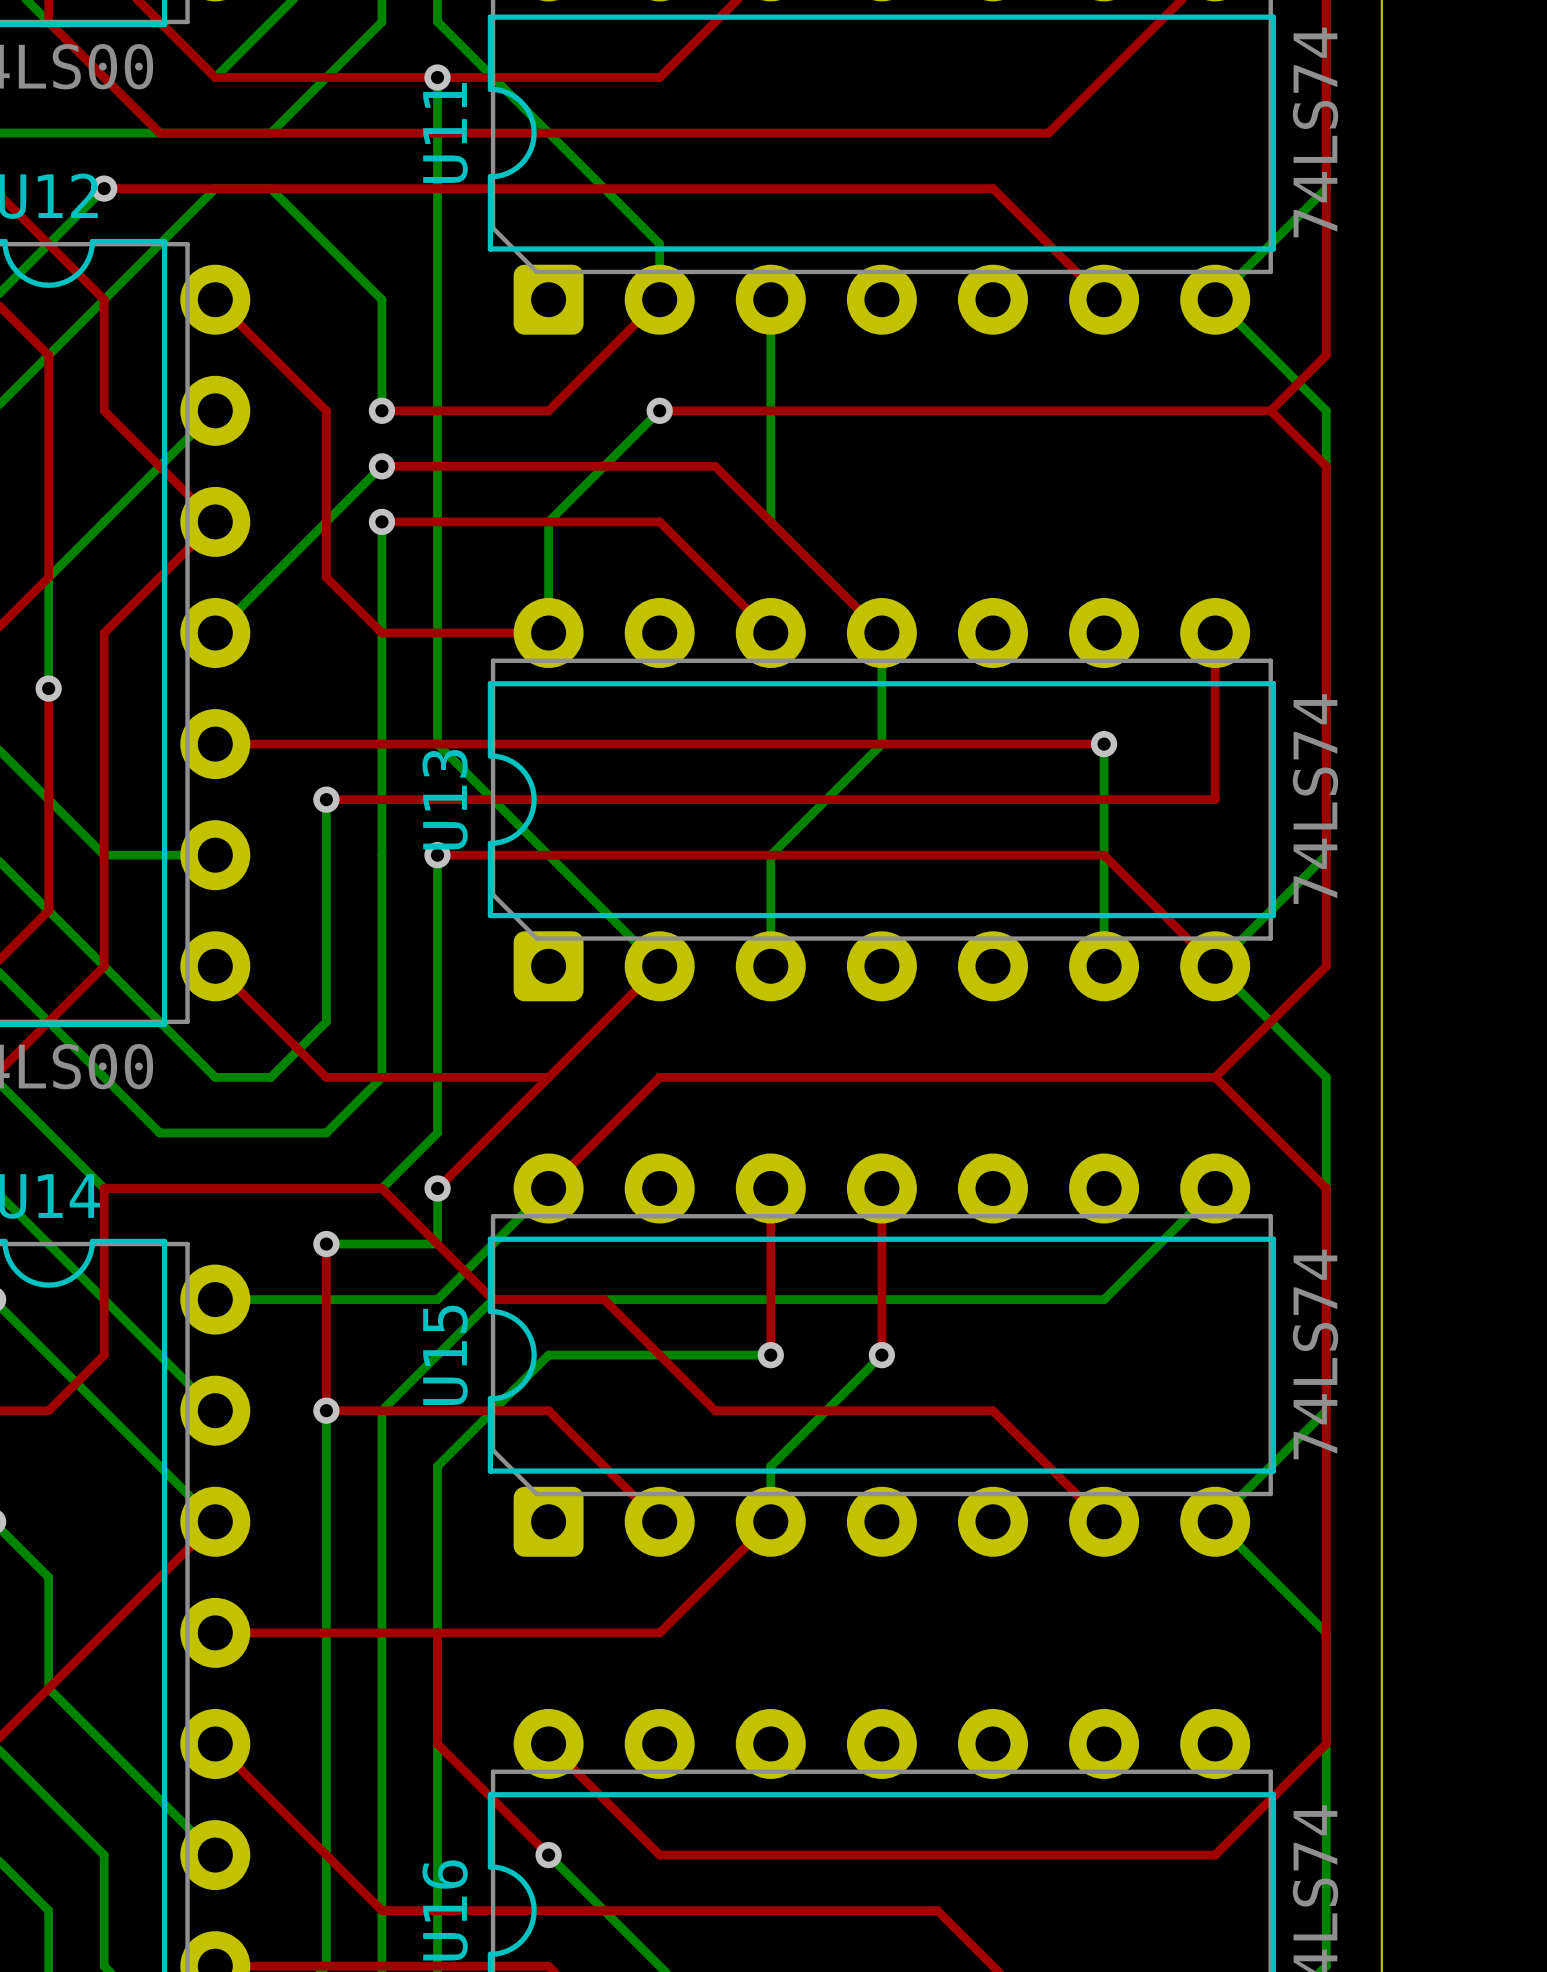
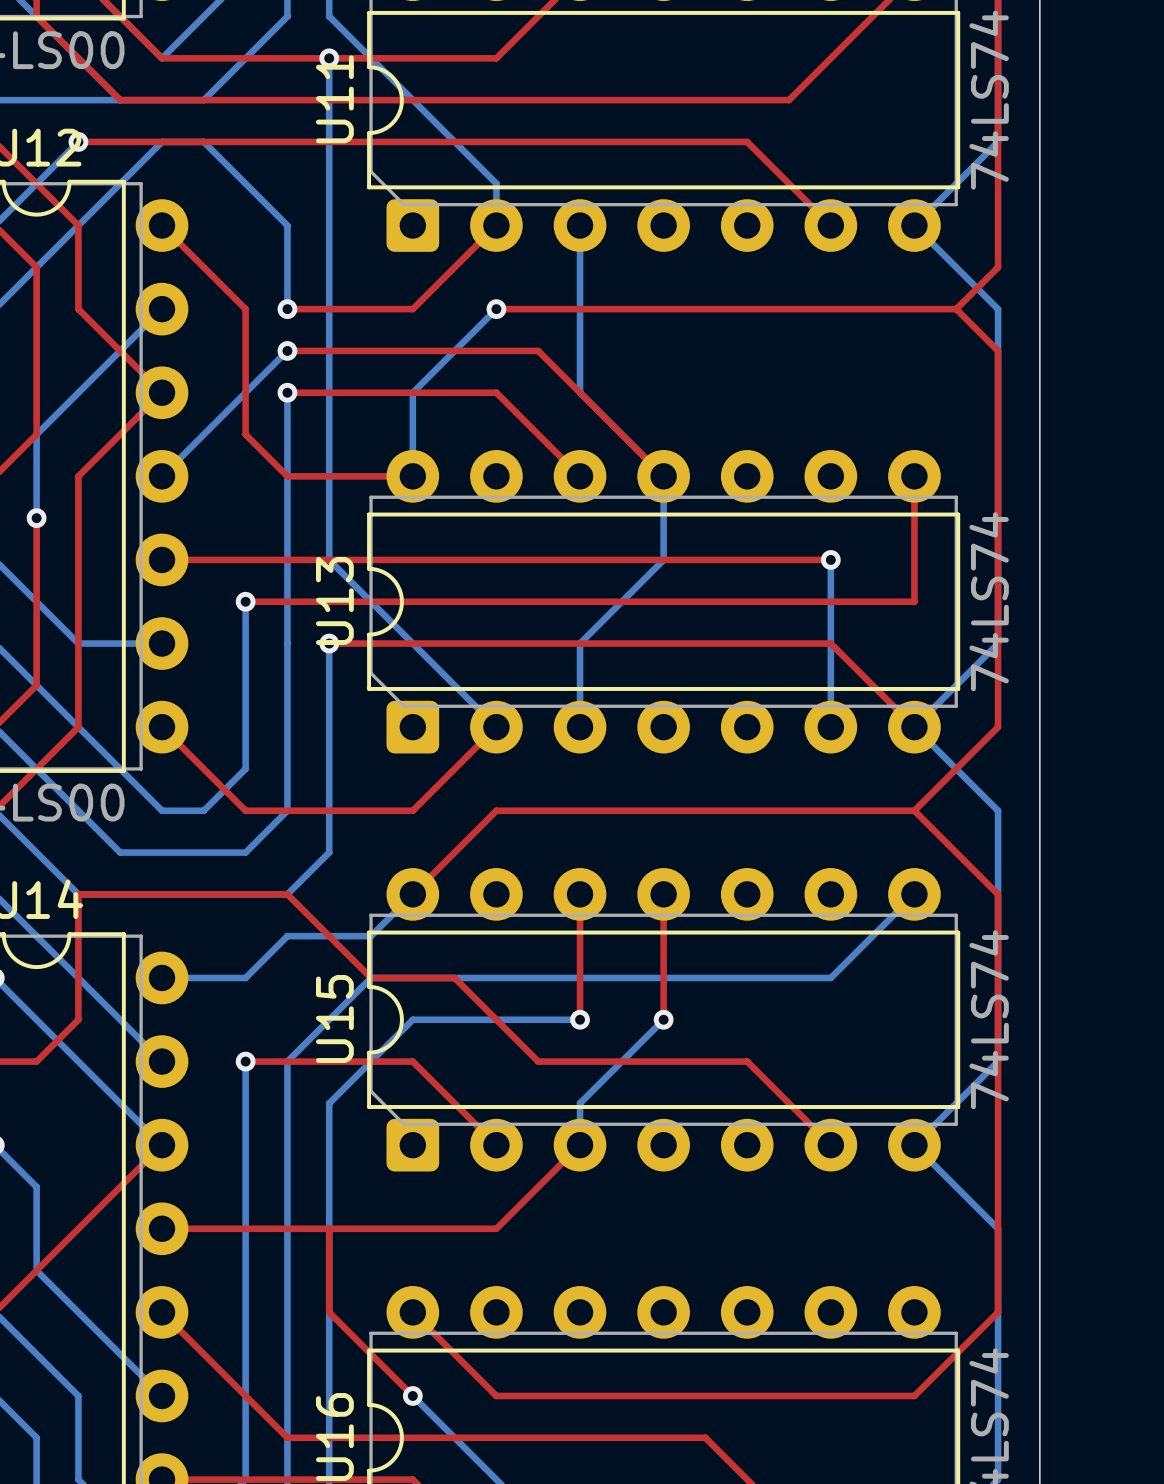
top track: (548, 1077) (437, 1188) -> none
bottom track: (437, 1188) (437, 1243) -> (371, 936) (329, 936)
via: (437, 1188) -> none
top track: (326, 1244) (326, 1410) -> none
bottom track: (326, 1244) (381, 1244) -> (245, 977) (287, 936)
via: (326, 1244) -> none
bottom track: (493, 1244) (437, 1299) (326, 1299) -> none

